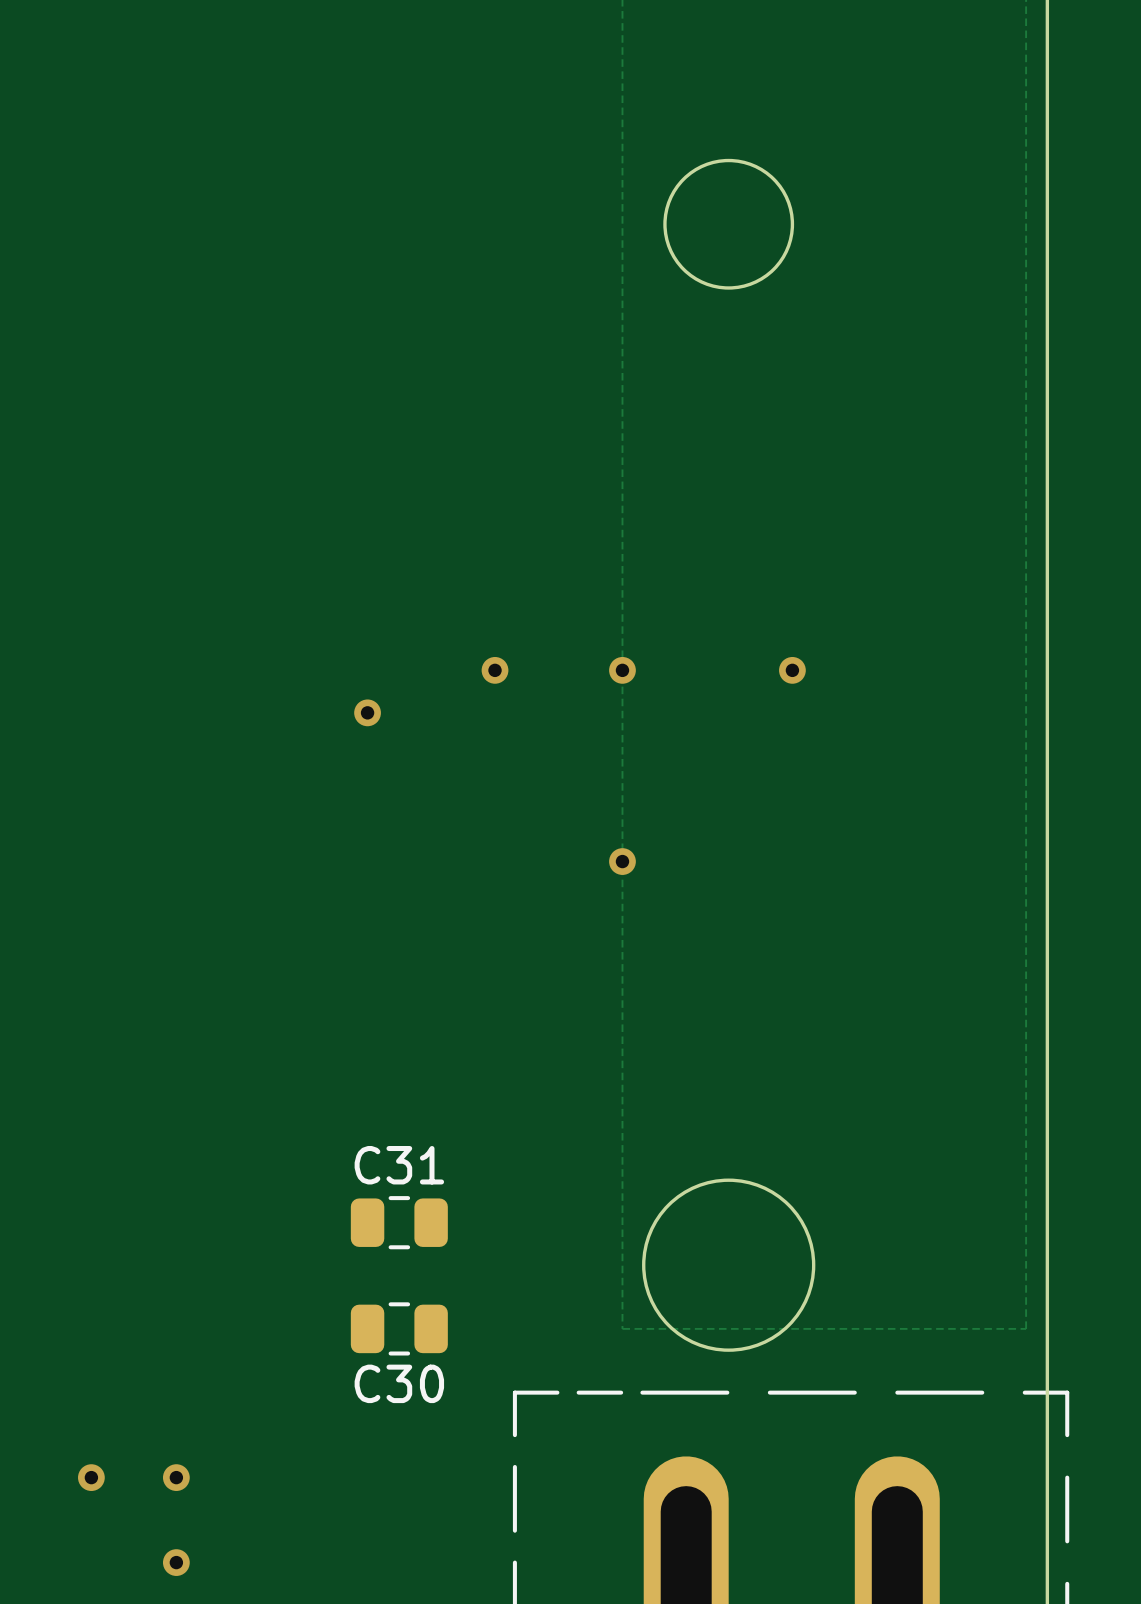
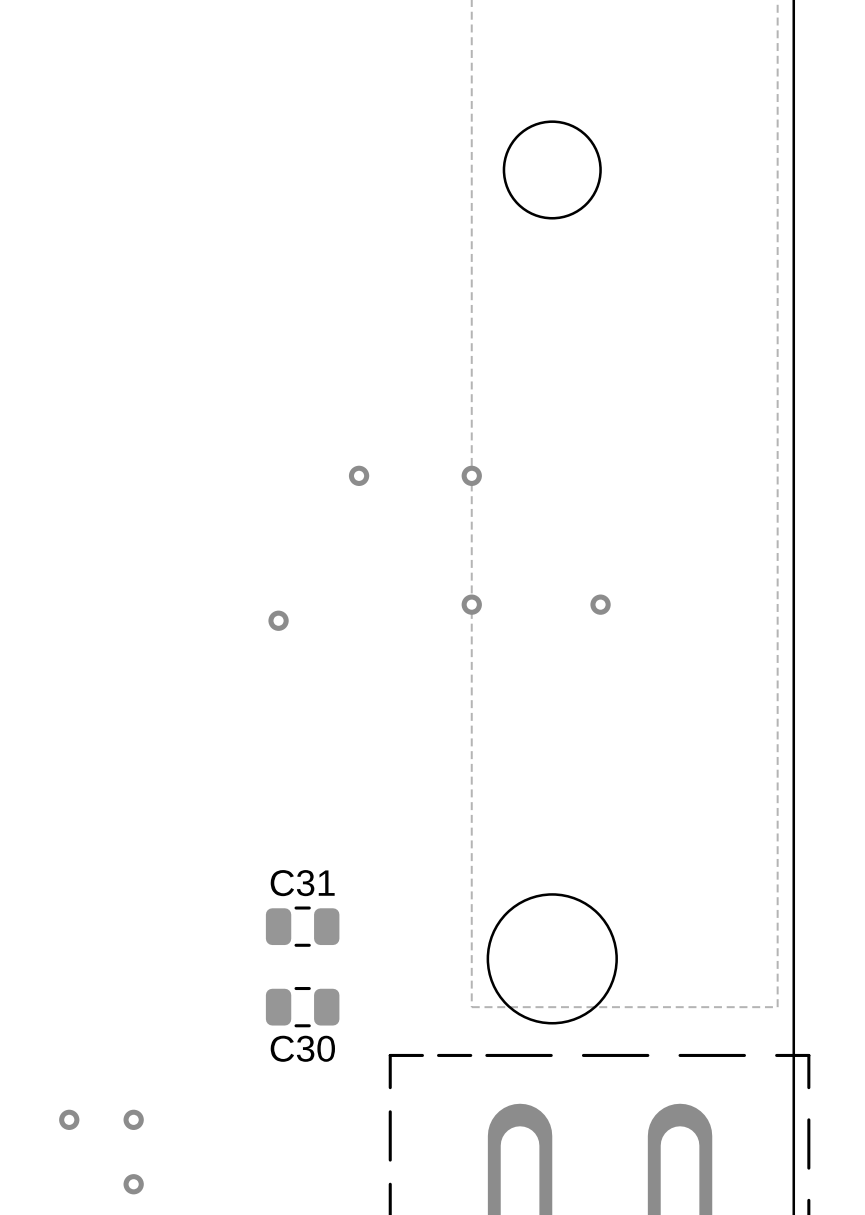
via position: (495, 670) -> (359, 475)
via position: (622, 670) -> (471, 475)
via: (792, 670) -> none
via: (367, 712) -> none
via: none -> (471, 604)
via: none -> (600, 604)
via: none -> (278, 620)
via: (622, 861) -> none

